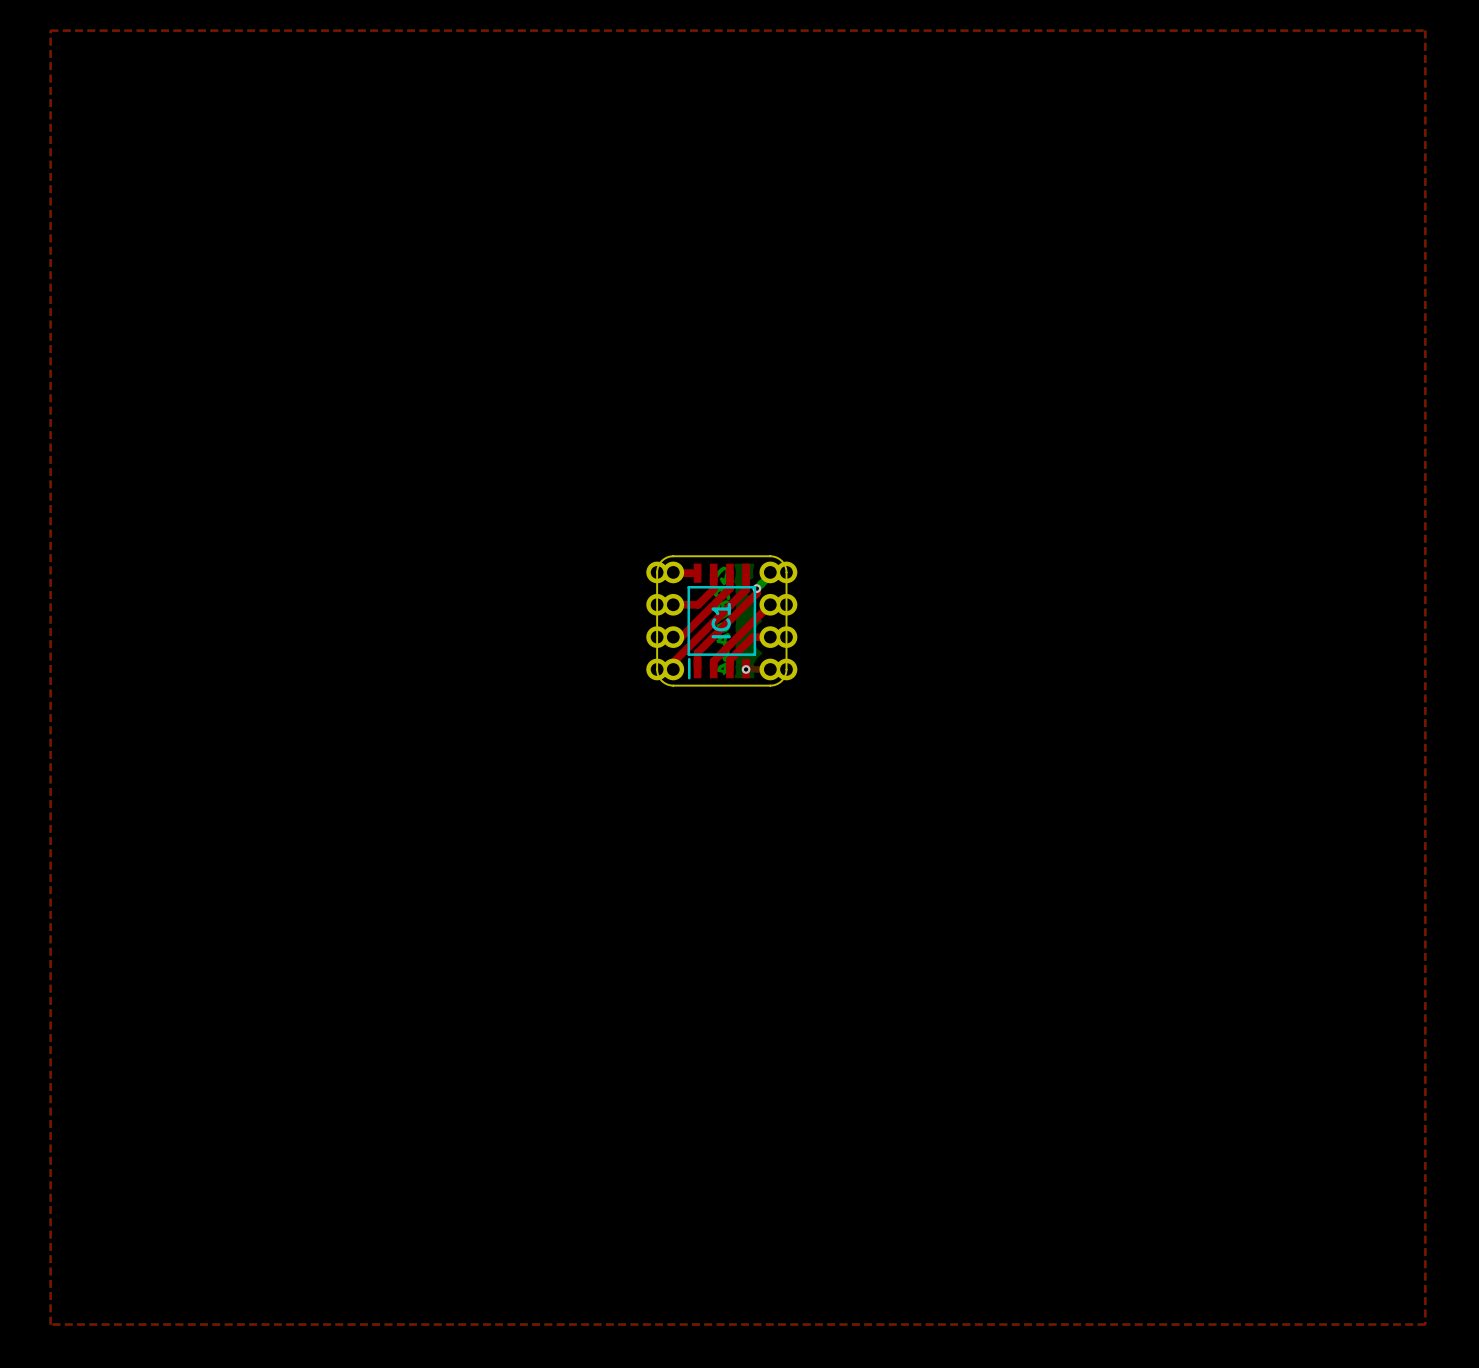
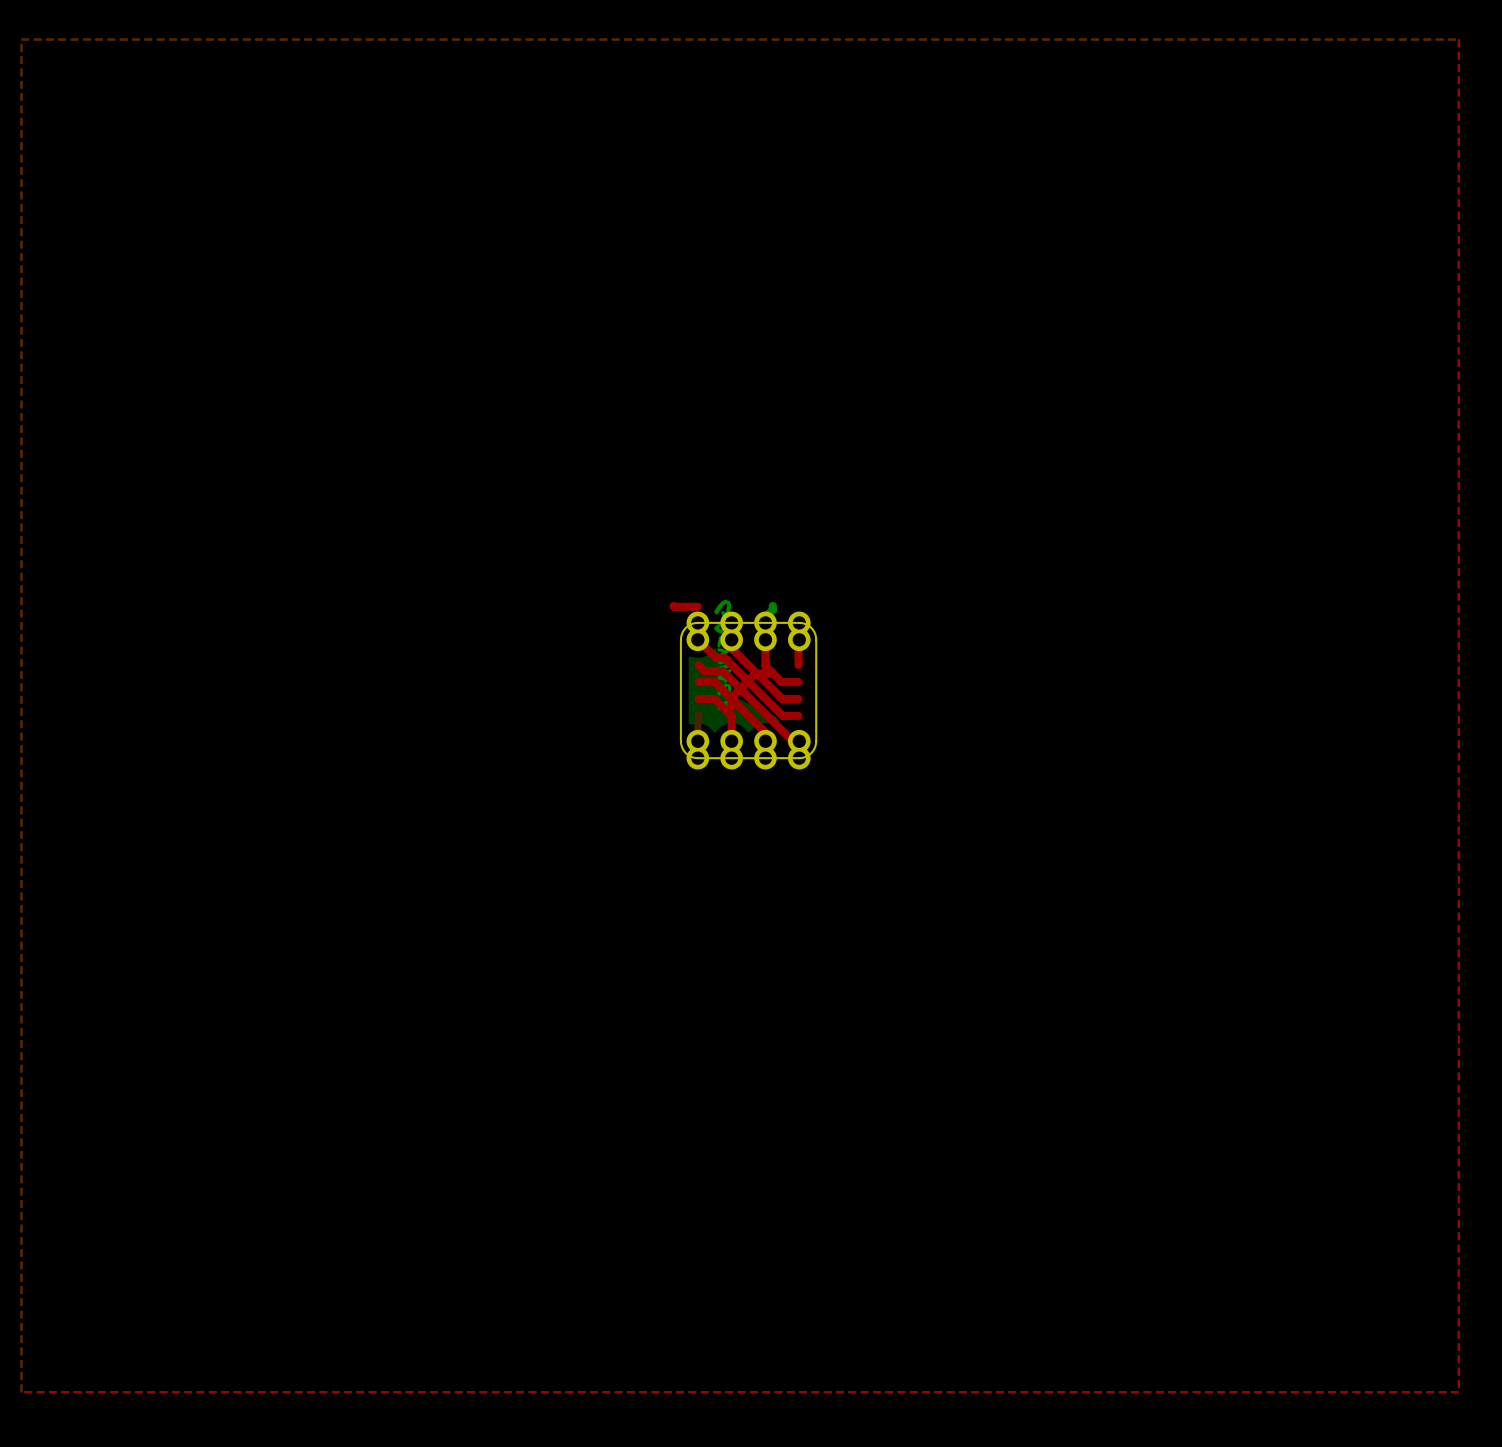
board edge: (770, 556) (780, 559) (786, 570) (786, 669) (783, 679) (778, 683) (770, 685) (673, 685) -> none
board edge: (770, 556) (673, 556) (665, 558) (660, 562) (657, 572) (657, 671) (663, 682) (673, 685) -> none
top track: (713, 573) (713, 589) (698, 604) (674, 604) -> none
top track: (729, 573) (729, 588) (681, 637) (674, 637) -> none
top track: (746, 573) (746, 589) (674, 661) (674, 669) -> none
board edge: none -> (697, 622) (799, 622) (807, 625) (812, 629) (816, 639) (816, 741) (814, 747) (809, 754) (799, 758) (697, 758) (689, 755) (684, 751) (680, 741) (681, 637) (687, 626) (697, 622)
top track: (756, 588) (756, 593) (697, 652) (697, 668) -> none
via: (756, 588) -> none
top track: (769, 604) (713, 661) (713, 668) -> none
top track: none -> (697, 640) (715, 657) (724, 657) (782, 715) (798, 715)
top track: none -> (731, 640) (731, 648) (782, 698) (798, 698)
top track: none -> (765, 640) (765, 665) (781, 682) (798, 682)
top track: none -> (799, 640) (798, 665)
part: (665, 620) -> none
part rotation: 0° (778, 620) -> 90° clockwise (748, 631)
IC1: (721, 621) -> none
top track: none -> (698, 665) (704, 671) (722, 671) (791, 740) (799, 740)
top track: none -> (698, 682) (714, 682) (765, 732) (765, 740)
top track: none -> (698, 698) (714, 698) (731, 715) (731, 740)
via: (746, 669) -> none
part: none -> (748, 749)

